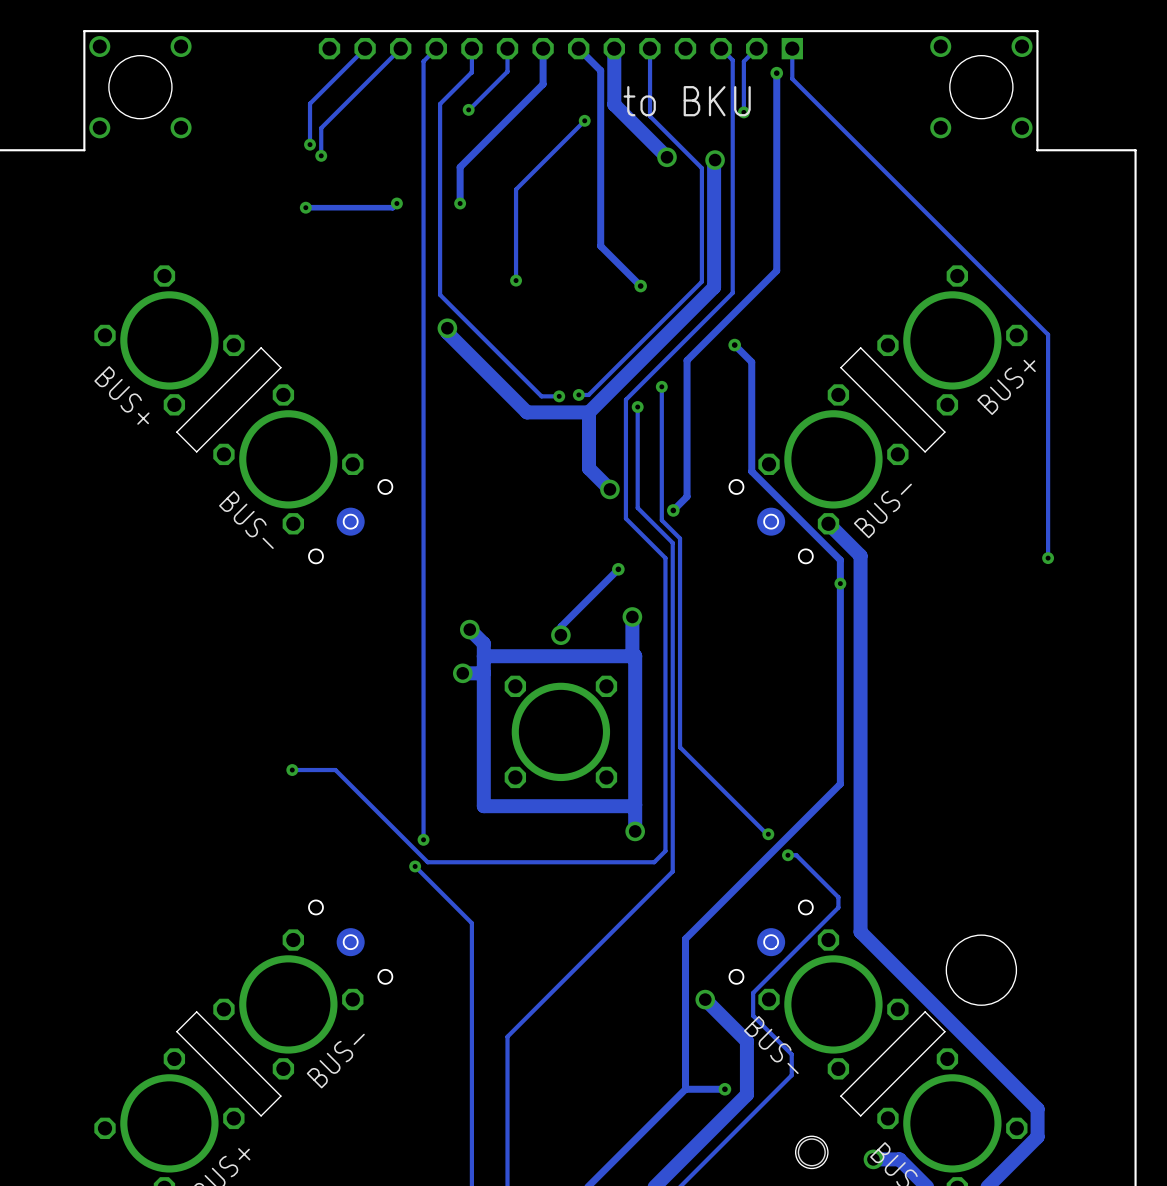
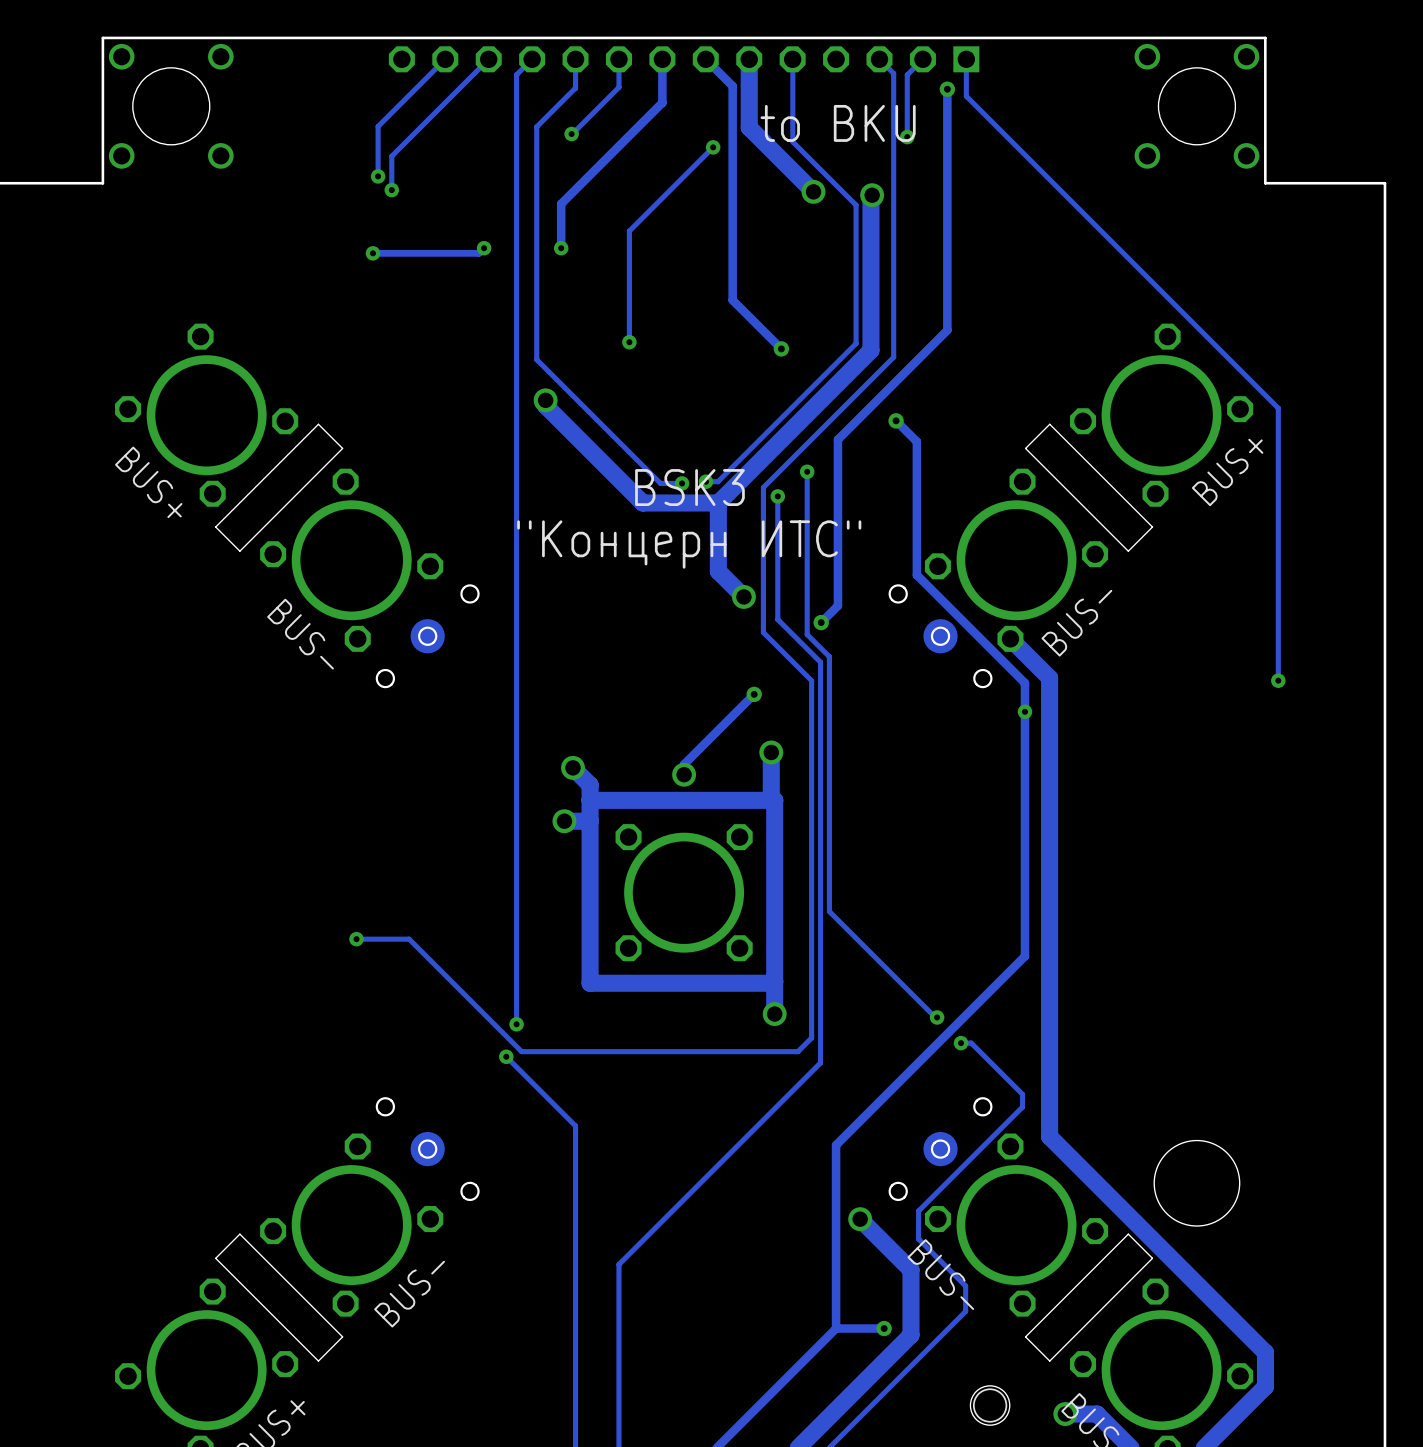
text: none -> BSK3 (689, 487)
text: none -> "Концерн ИТС" (689, 544)

